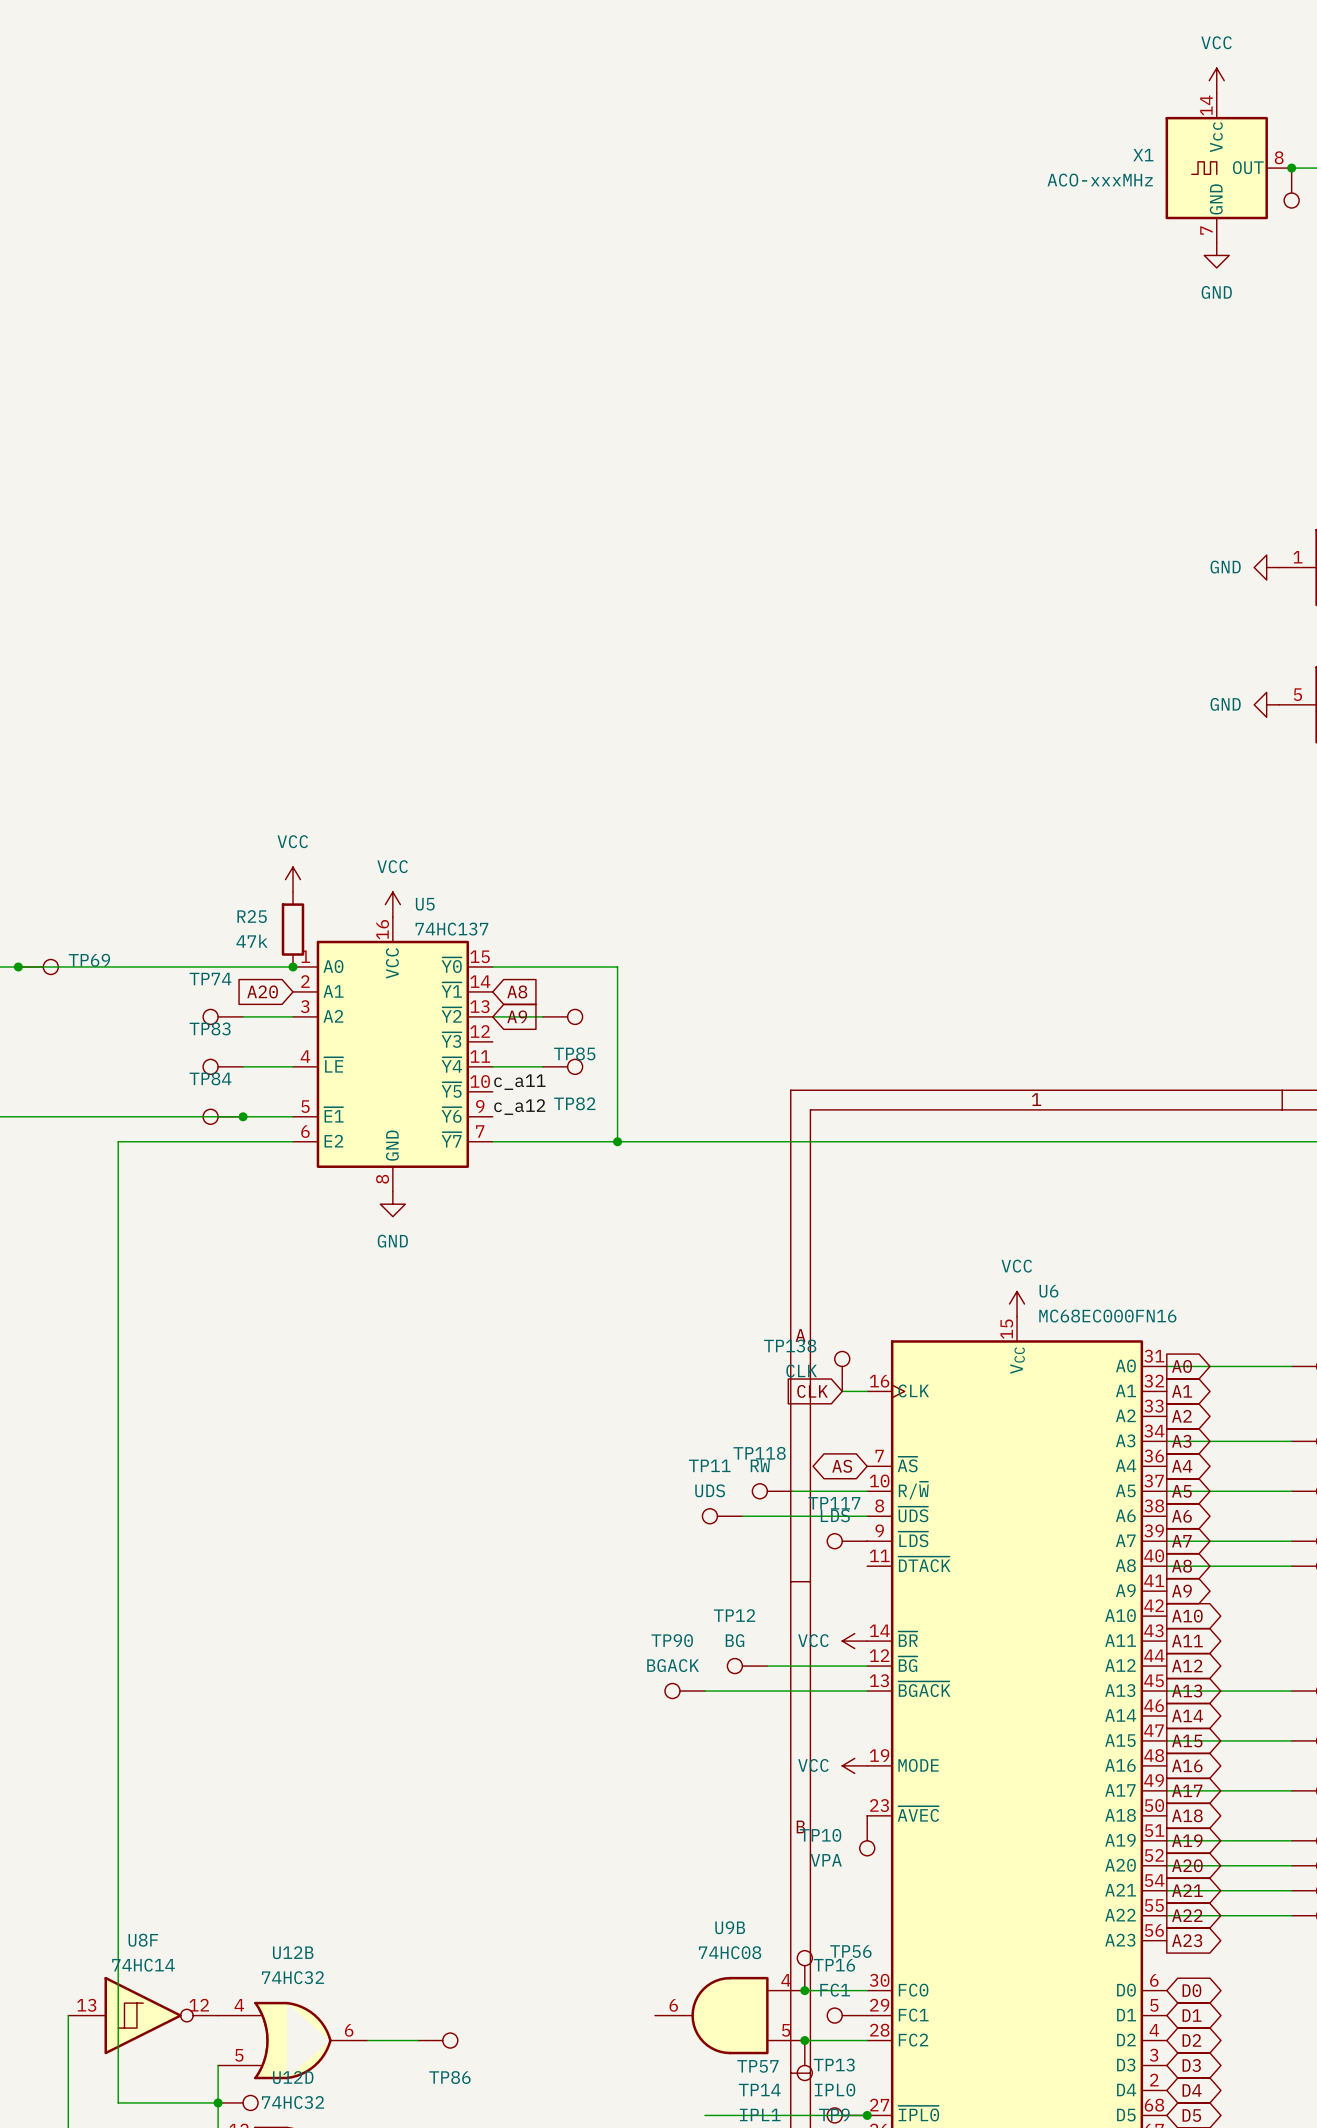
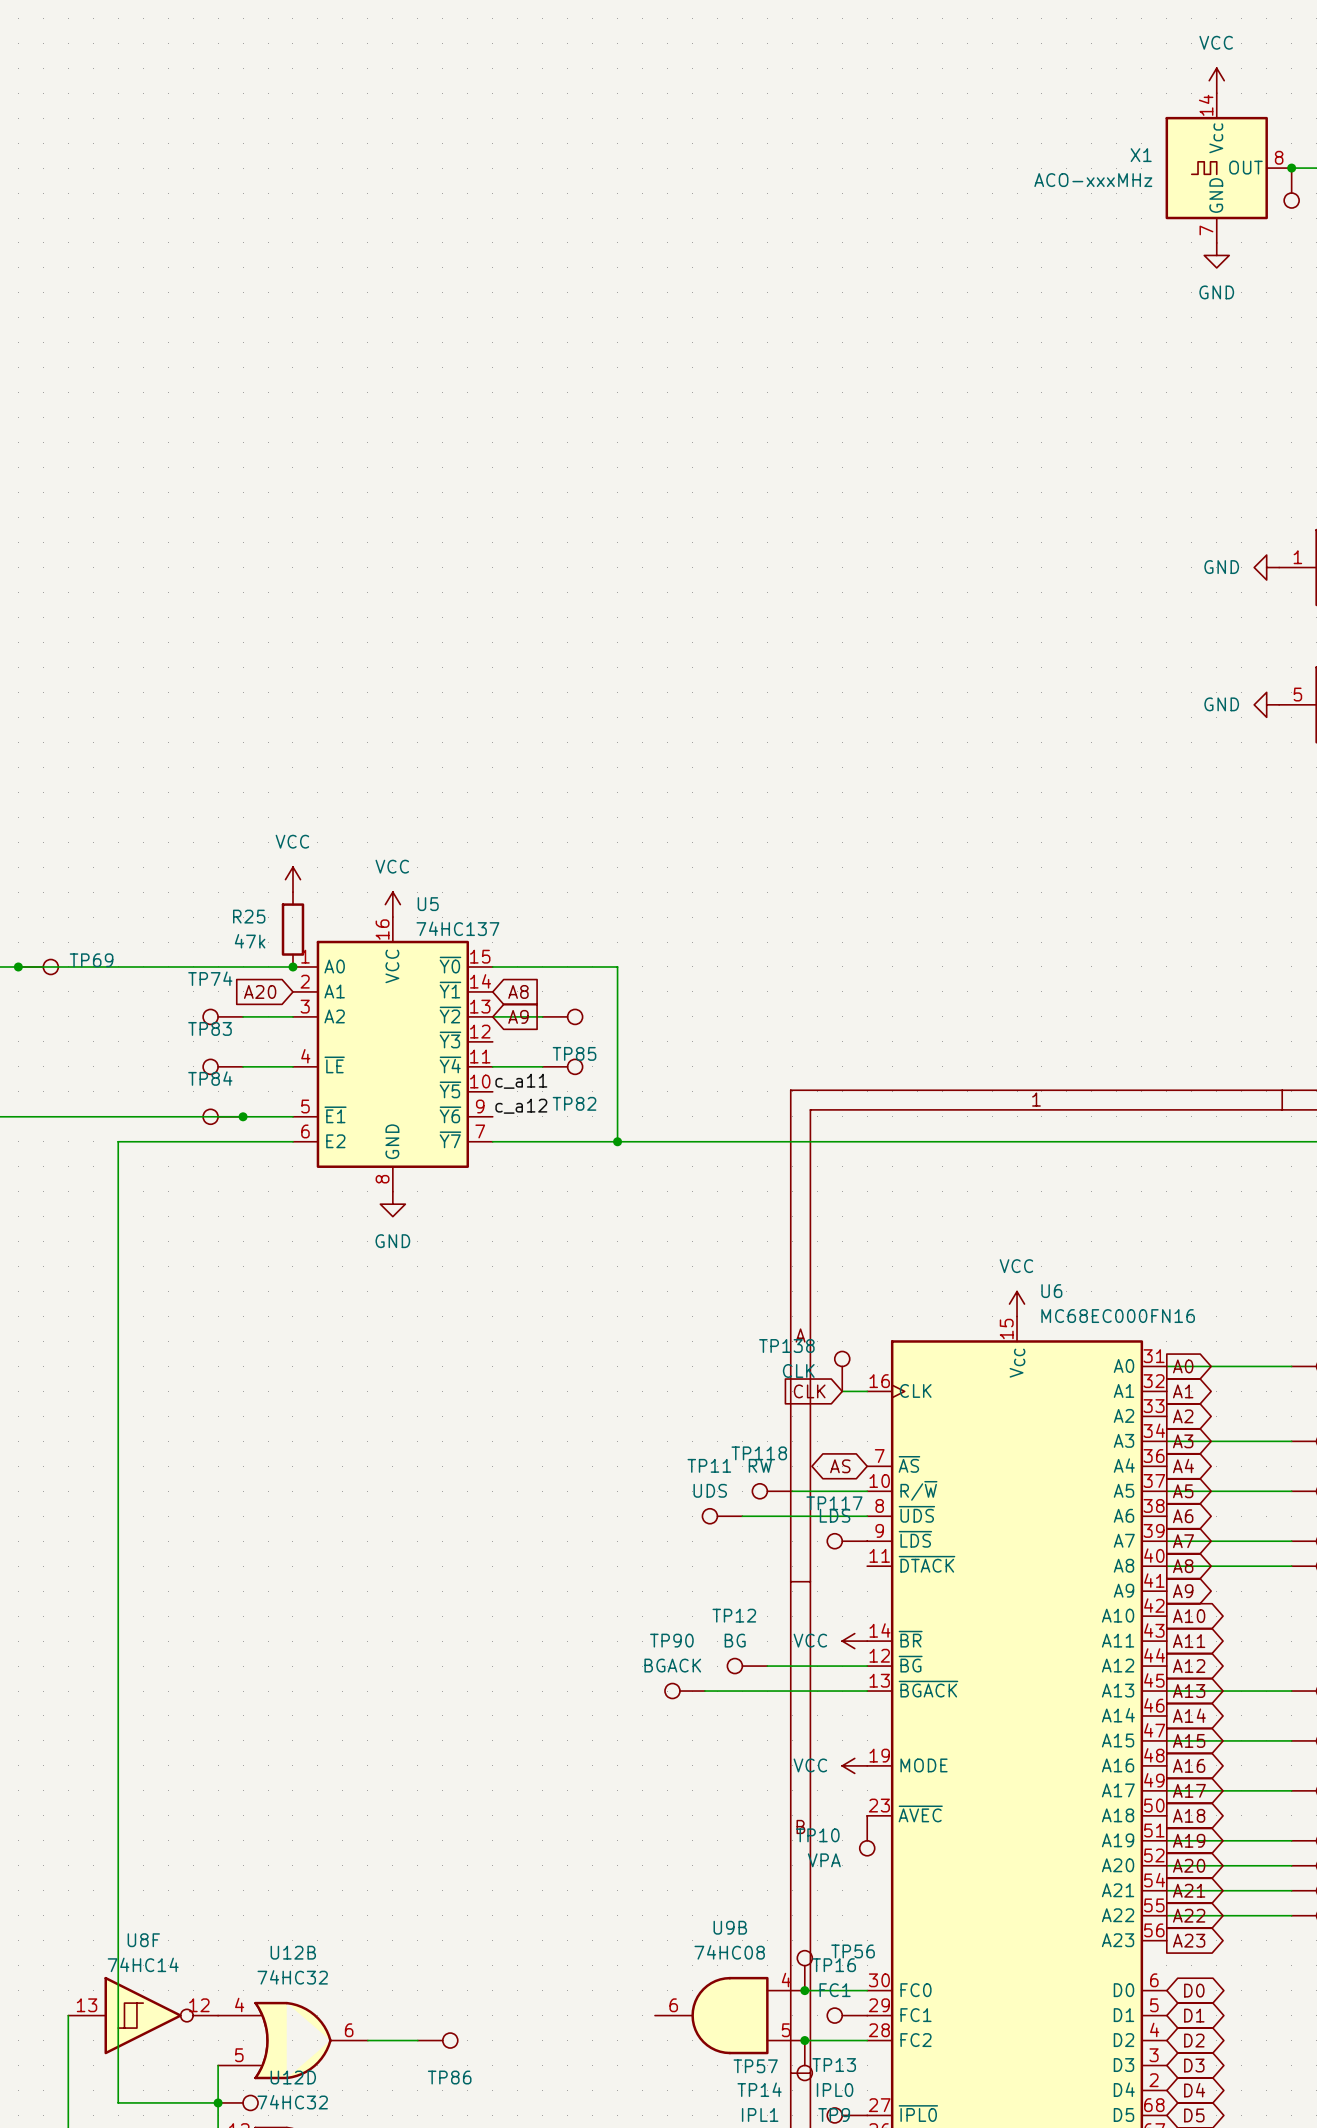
wire: (704, 2115) (867, 2115) -> none
junction: (867, 2115) -> none

